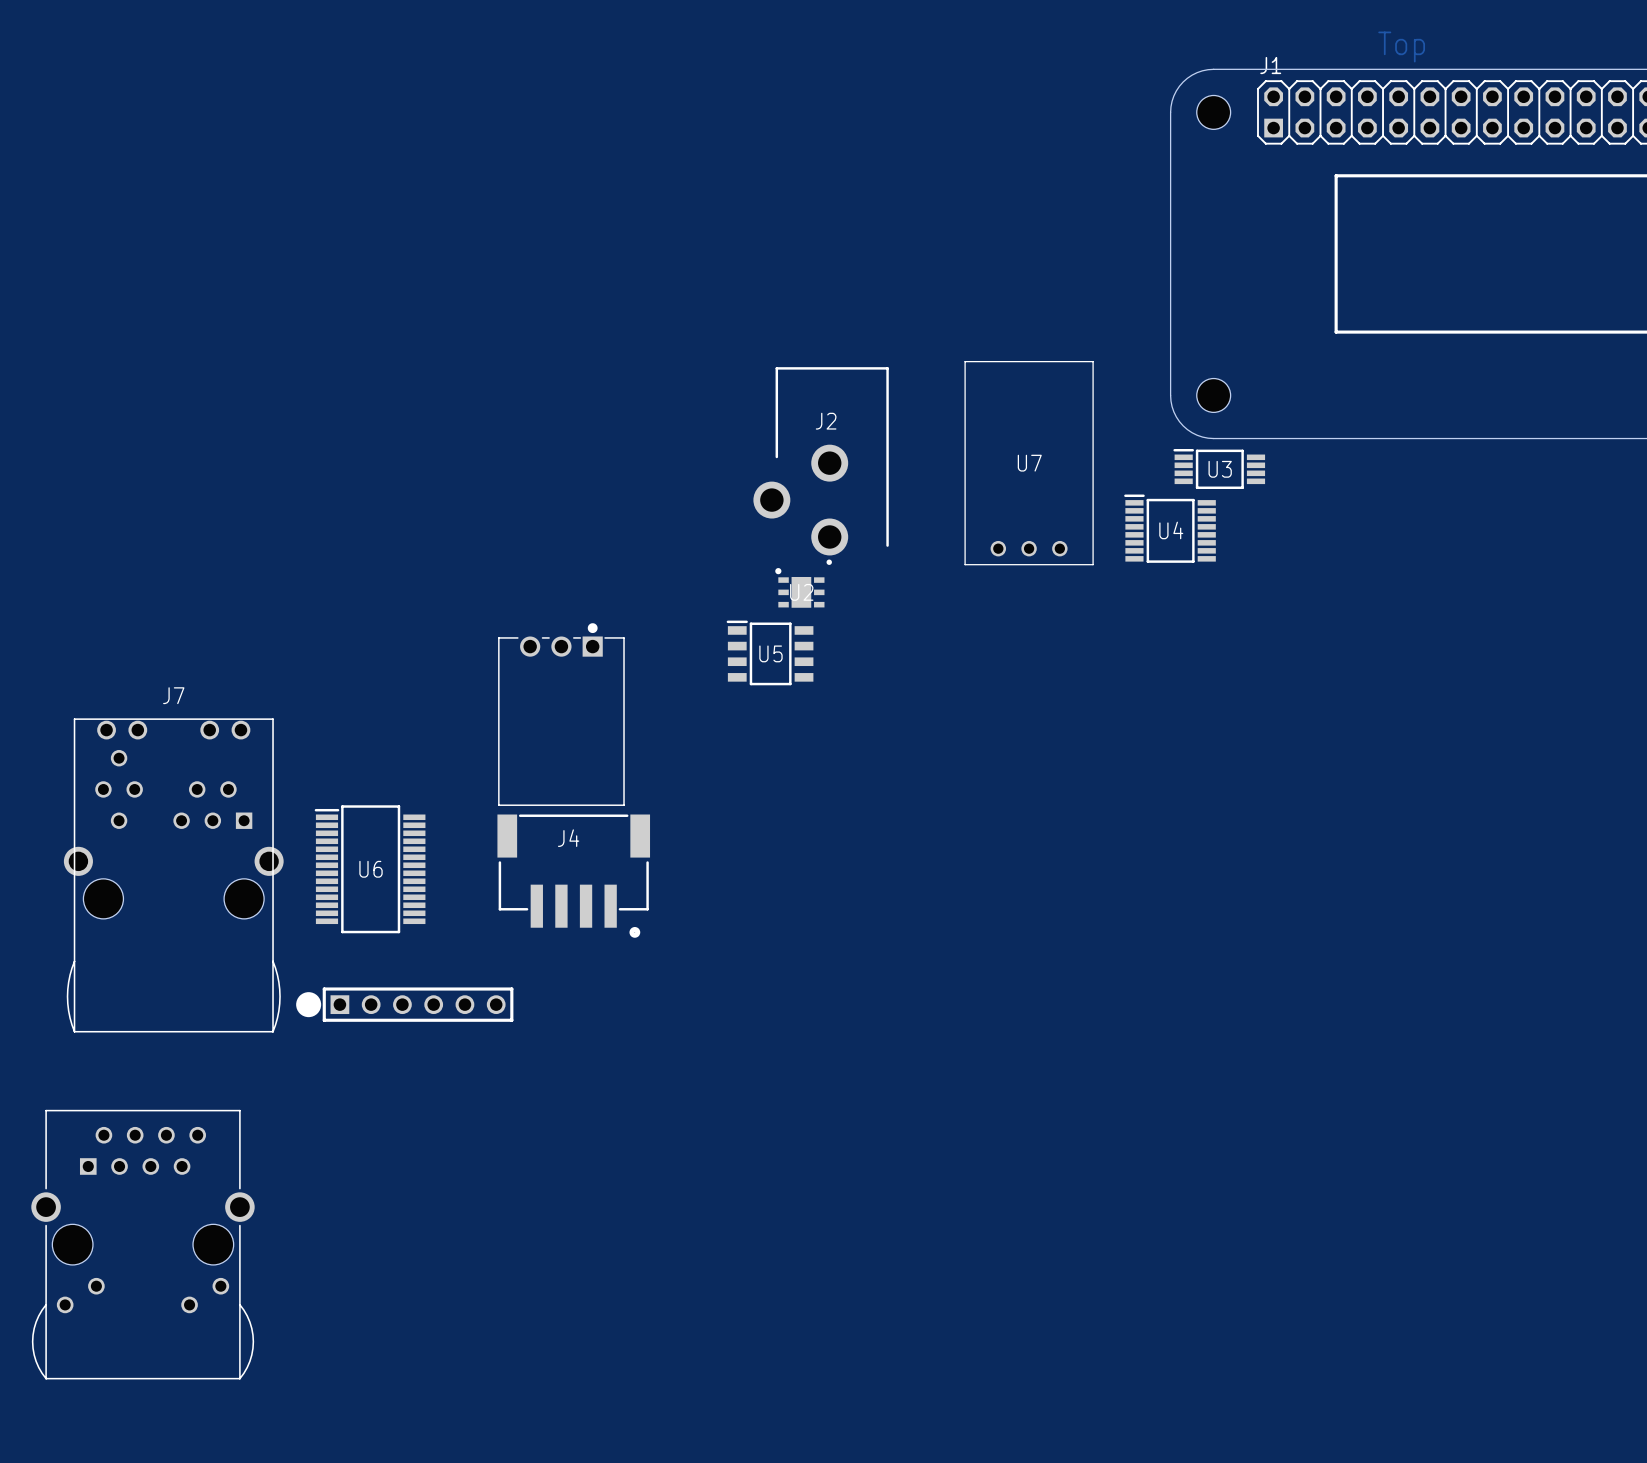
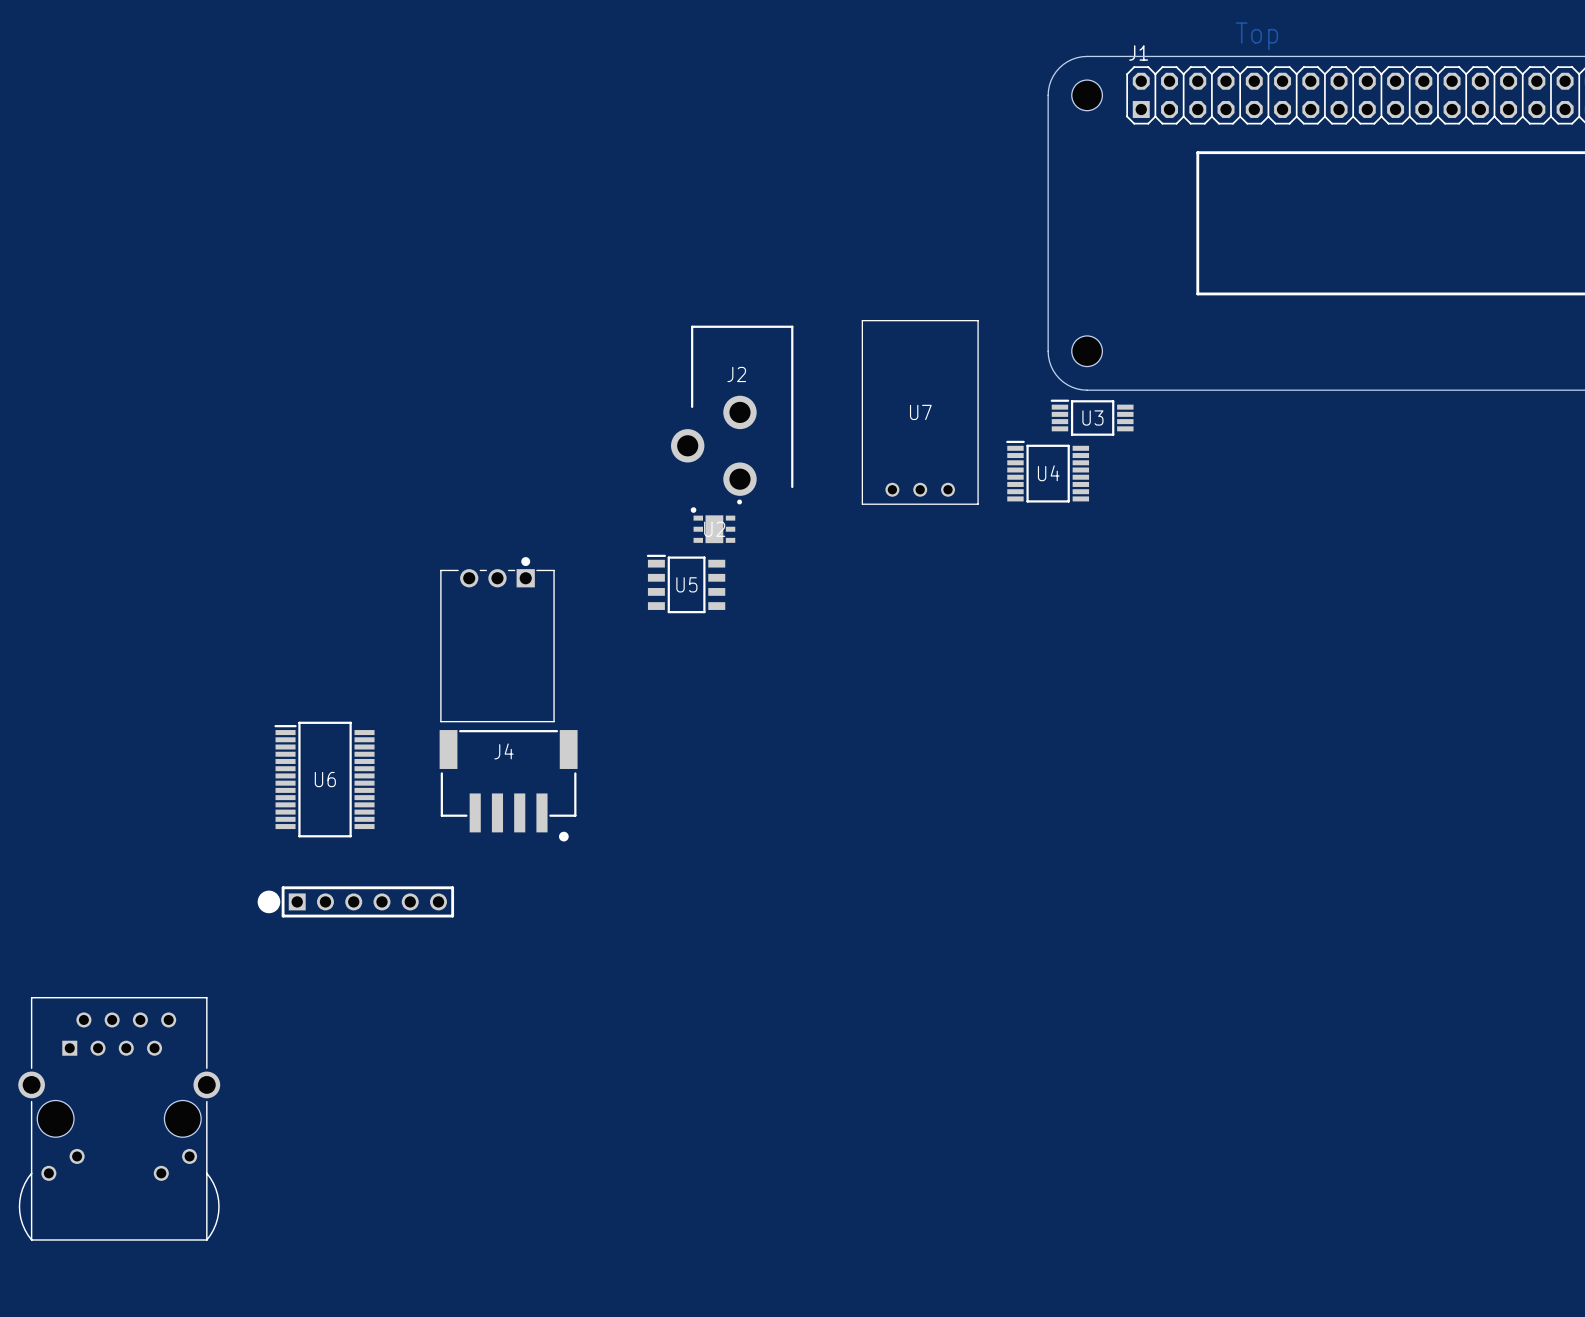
J7: (173, 875) -> none

